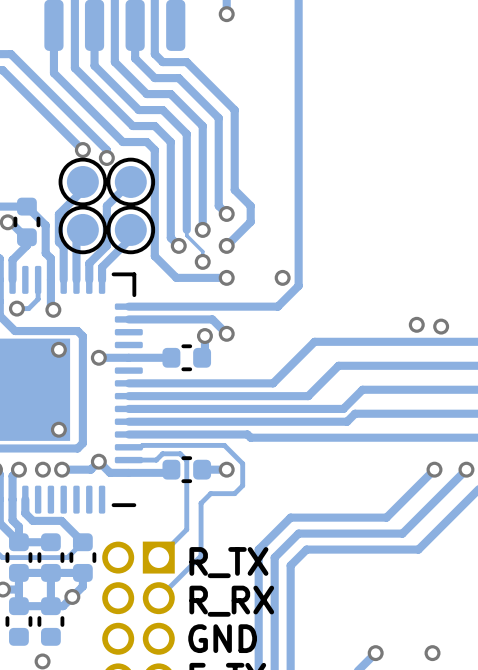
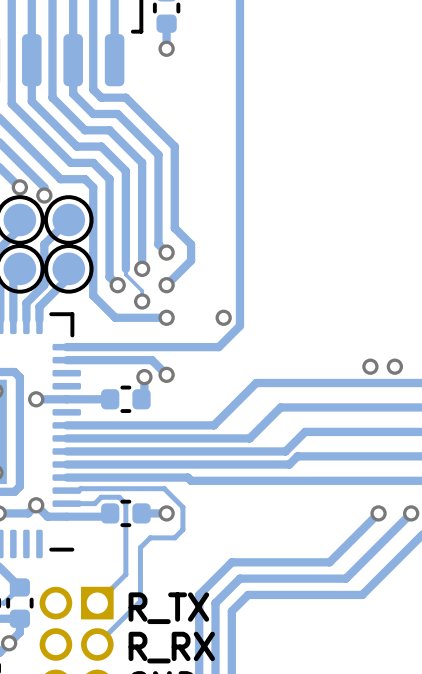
via: (416, 324) -> none
via: none -> (370, 366)
via: none -> (394, 366)
via: (441, 326) -> none

